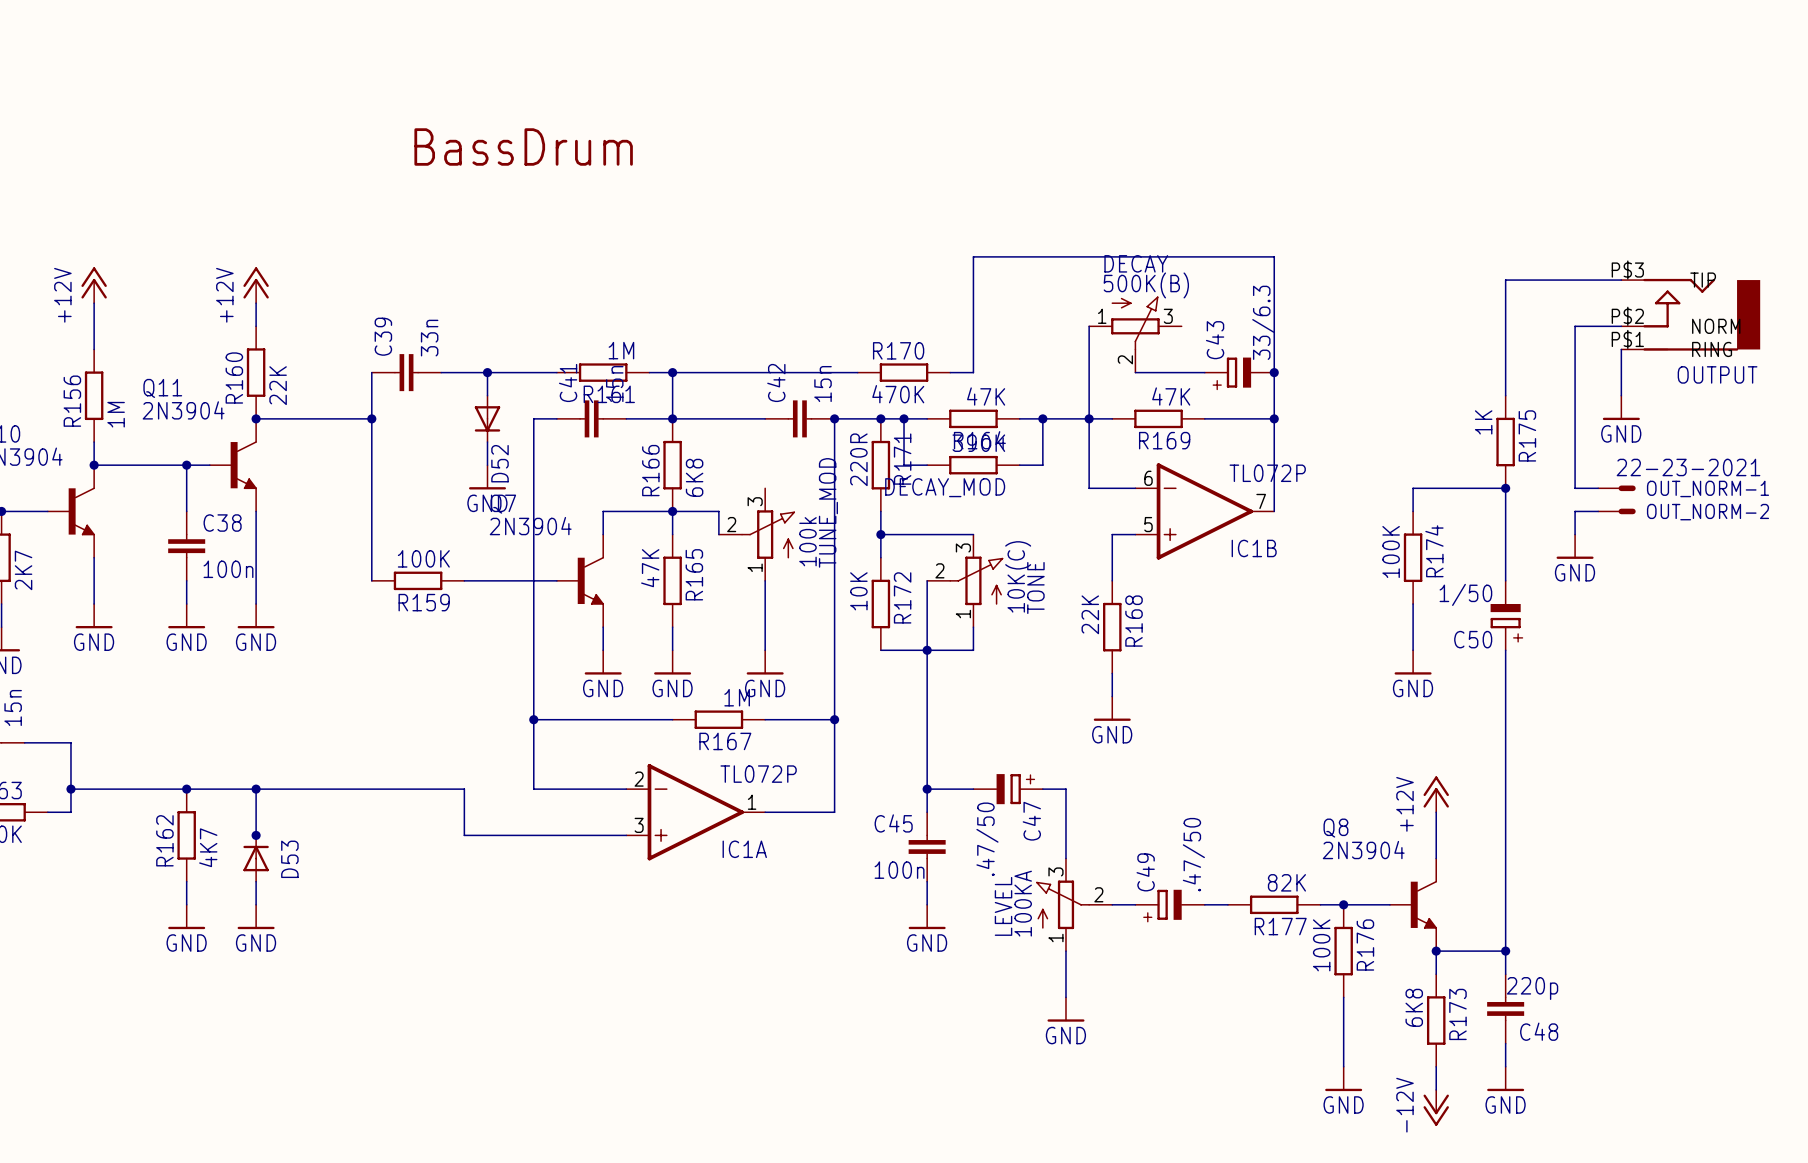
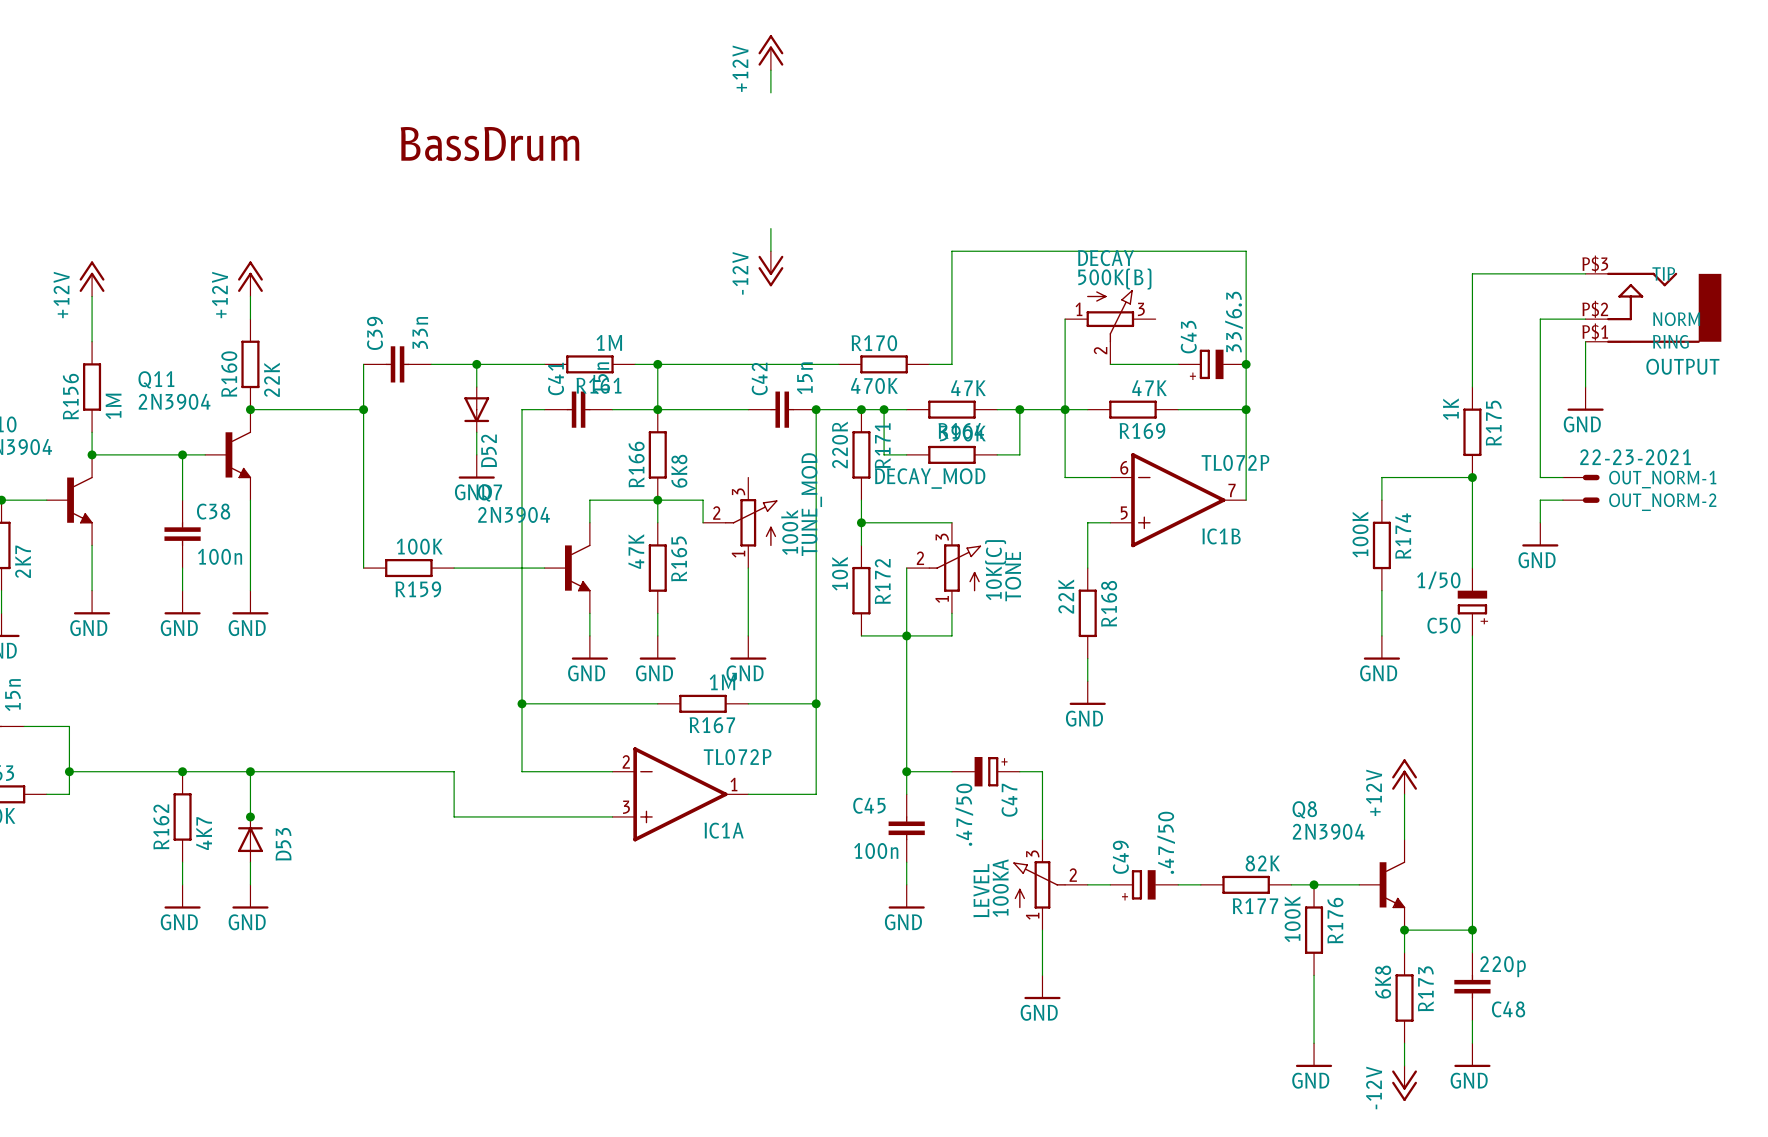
power symbol: none -> +12V (770, 52)
wire: none -> (770, 70) (770, 92)
wire: none -> (770, 228) (770, 251)
power symbol: none -> -12V (770, 268)

